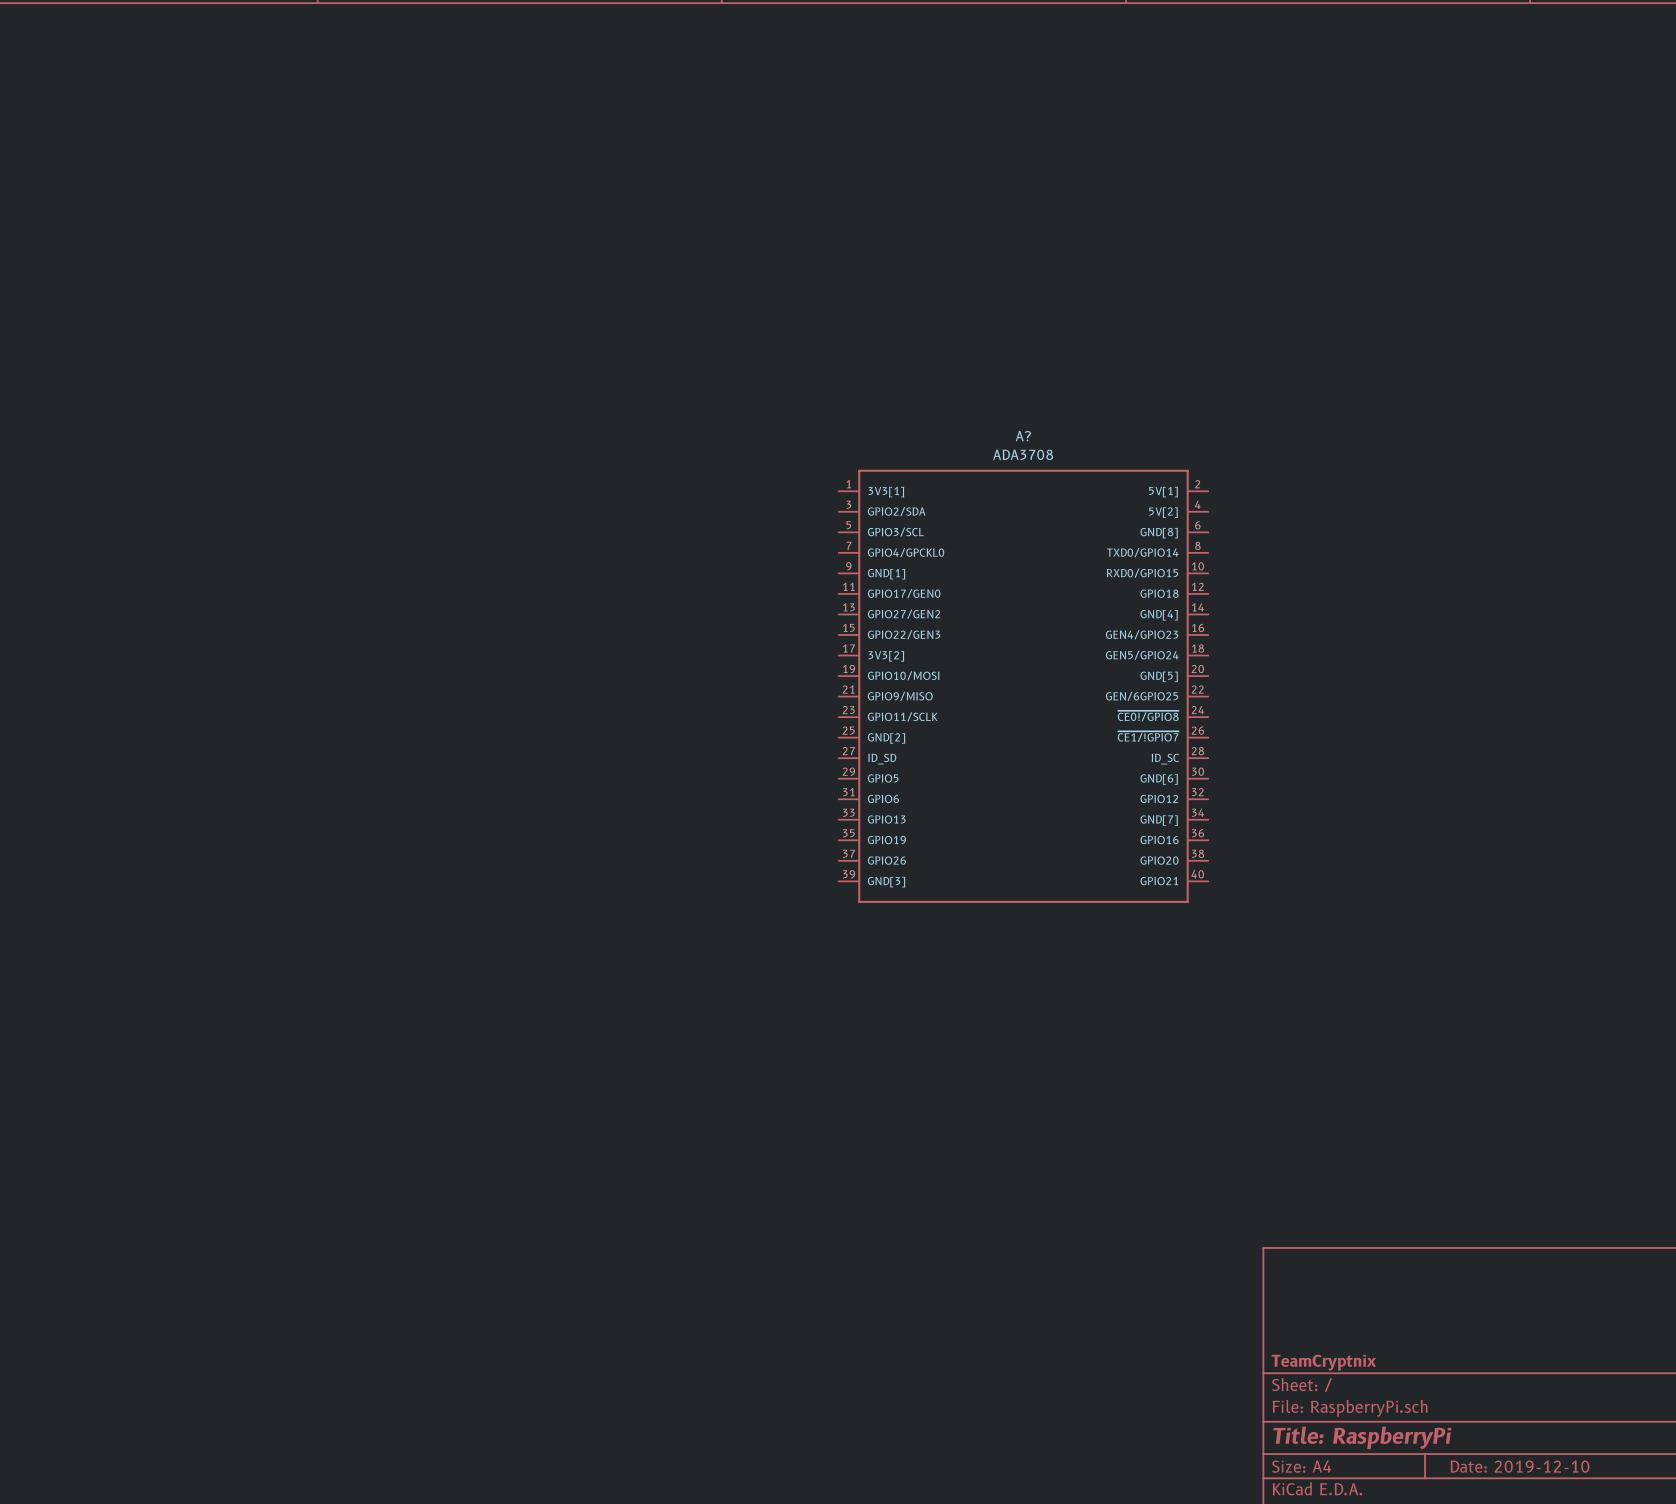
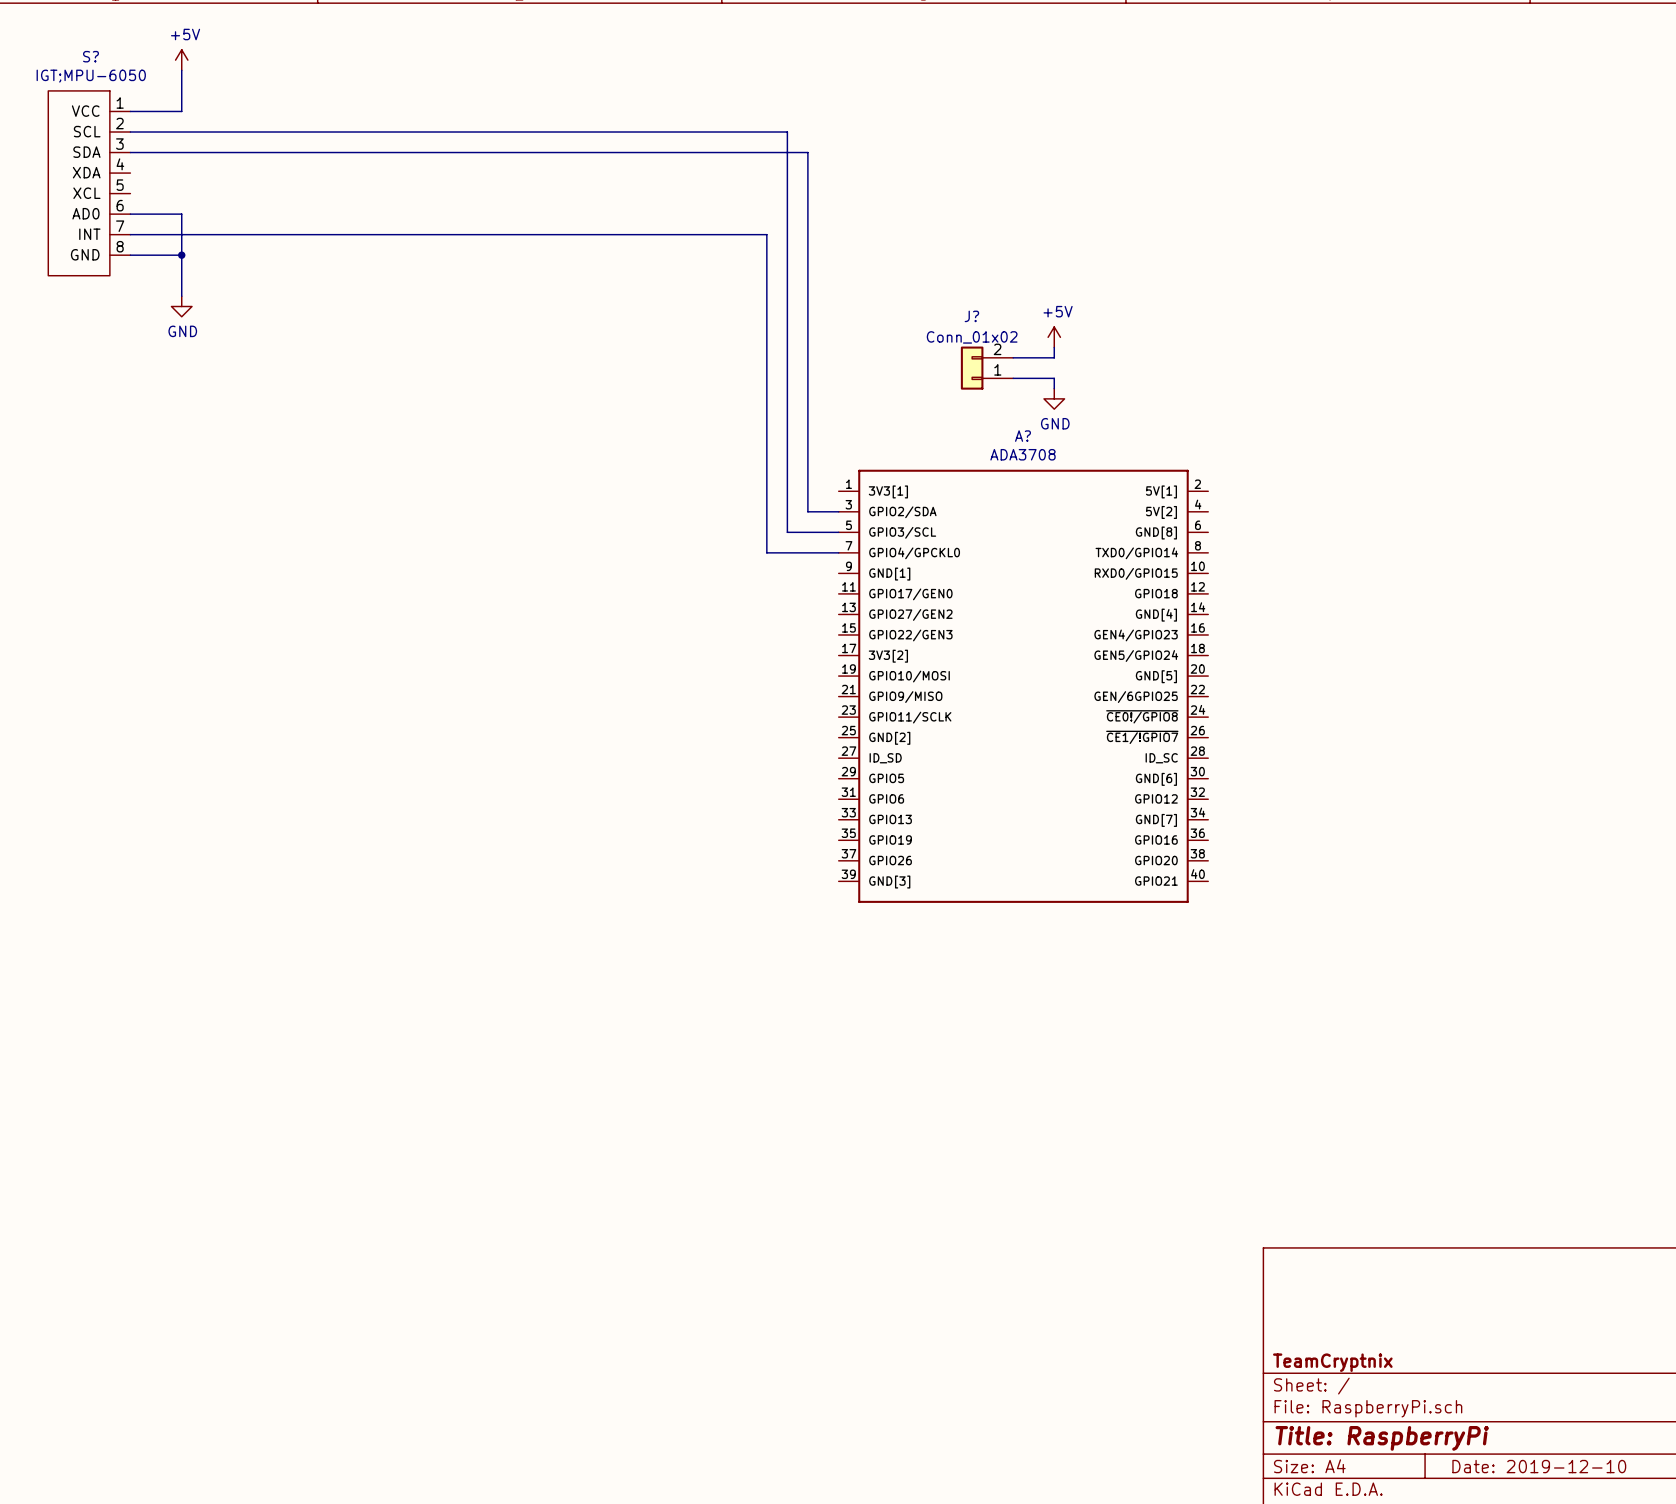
power symbol: none -> +5V (181, 60)
wire: none -> (181, 70) (181, 111) (130, 111)
wire: none -> (130, 132) (787, 132) (787, 532) (838, 532)
wire: none -> (130, 152) (807, 152) (807, 511) (838, 511)
S?: none -> IGT;MPU-6050 (89, 183)
wire: none -> (130, 214) (181, 214) (181, 296)
wire: none -> (130, 234) (766, 234) (766, 552) (838, 552)
wire: none -> (130, 255) (181, 255)
junction: none -> (181, 255)
power symbol: none -> GND (181, 306)
power symbol: none -> +5V (1054, 337)
wire: none -> (1054, 347) (1054, 357) (1013, 357)
J?: none -> Conn_01x02 (987, 368)
wire: none -> (1013, 378) (1054, 378) (1054, 388)
power symbol: none -> GND (1054, 398)

